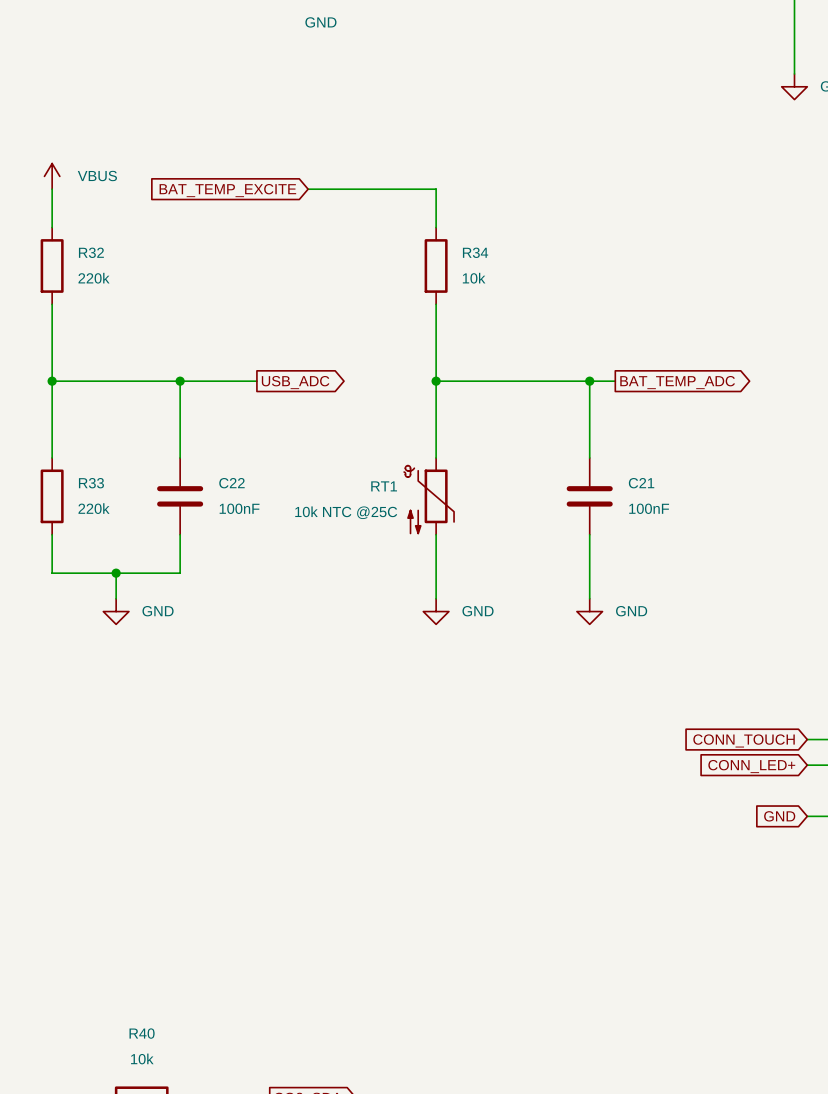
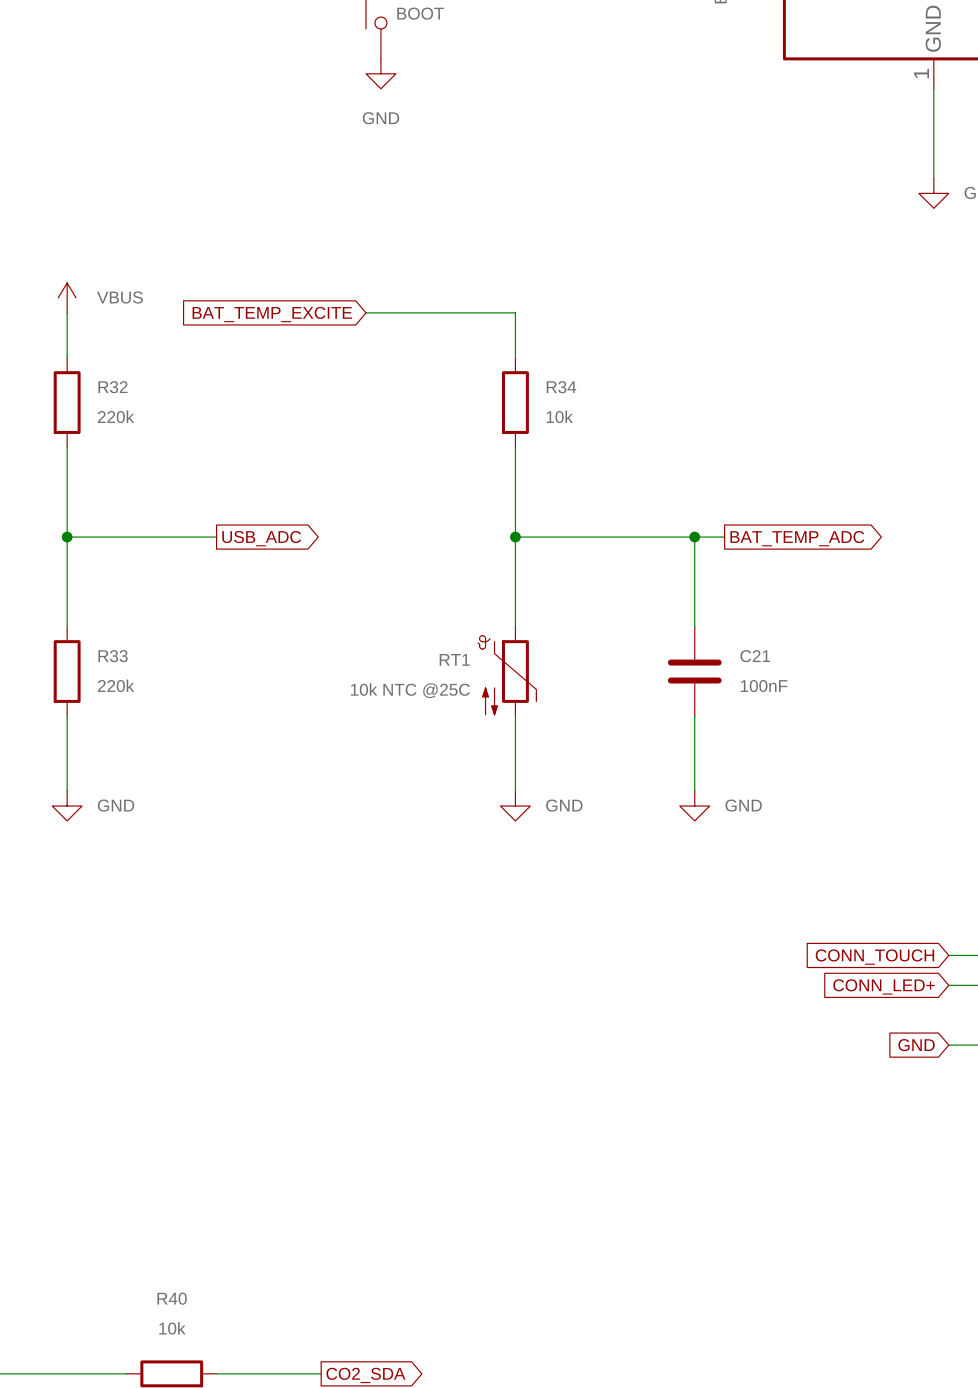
junction: (180, 381) -> none
wire: (256, 381) (180, 381) (180, 457) -> none
global label position: USB_ADC (295, 382) -> USB_ADC (261, 538)
C22: 100nF (180, 496) -> none
wire: (180, 534) (180, 573) (52, 573) -> (67, 791) (67, 761)
wire: (116, 573) (116, 598) -> none
junction: (116, 573) -> none
power symbol position: GND (116, 611) -> GND (67, 806)

